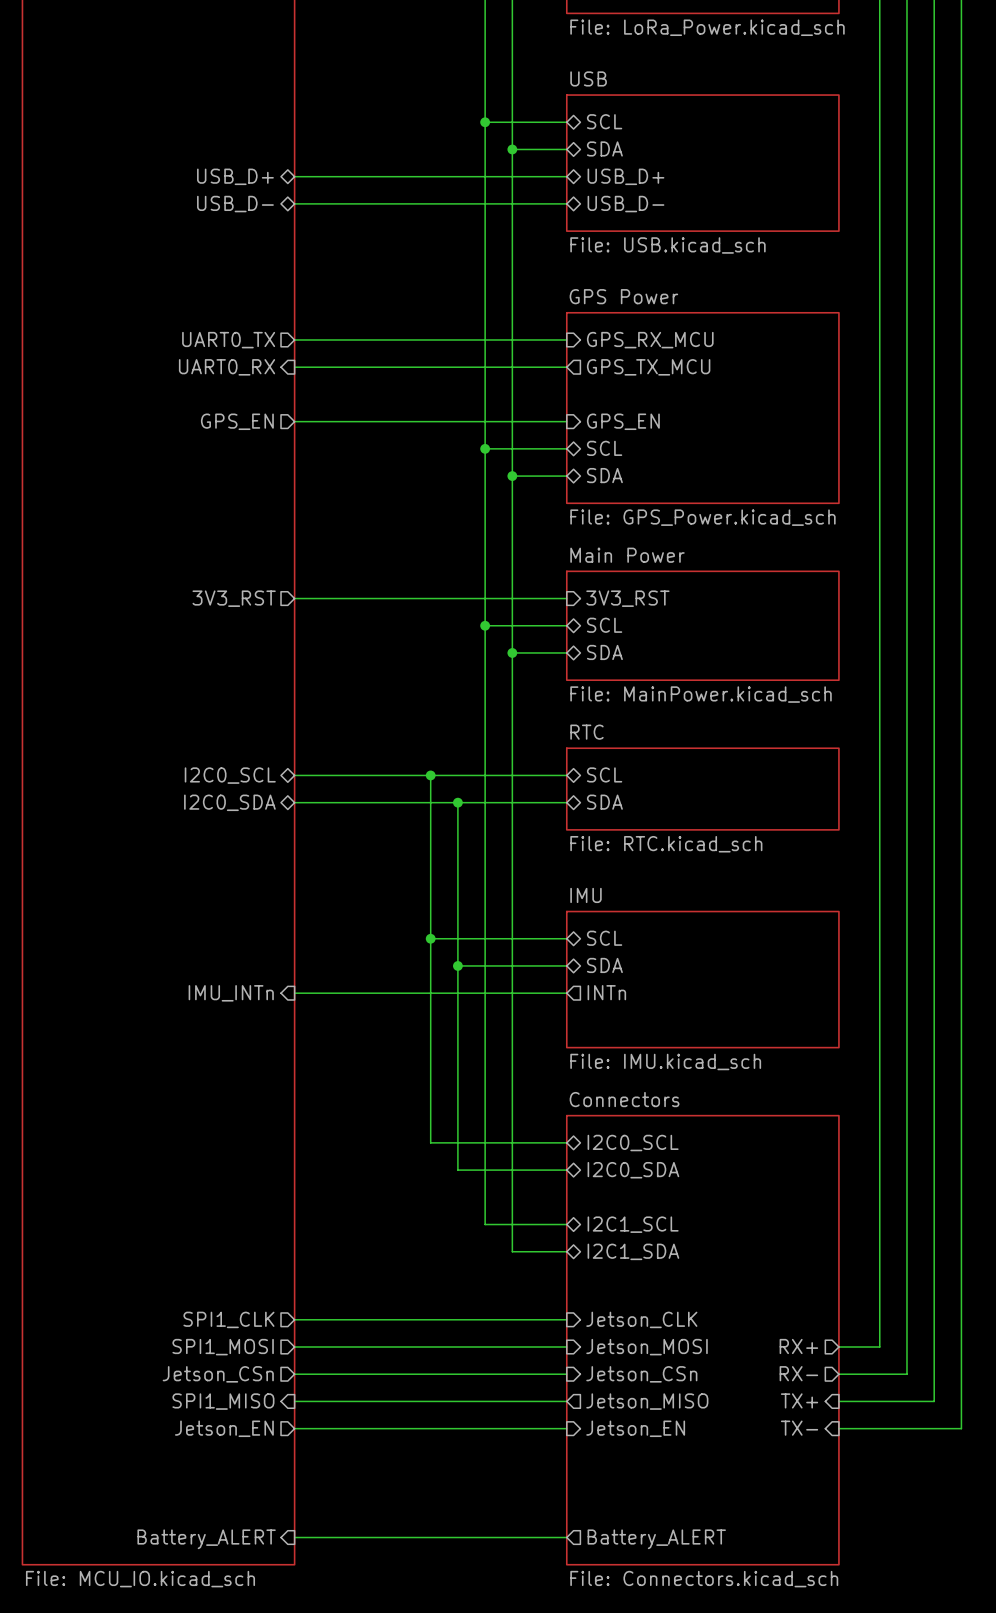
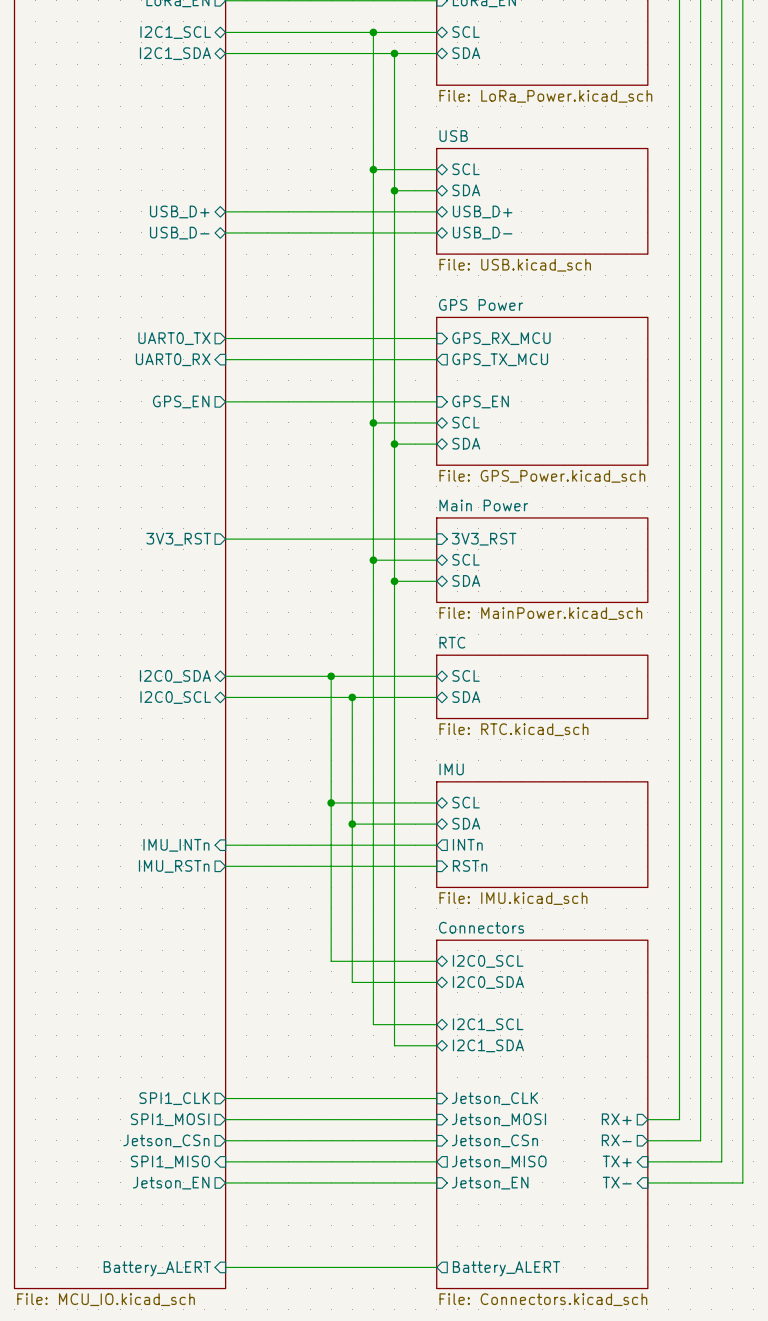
sheet pin: I2C0_SCL (230, 775) -> I2C0_SDA (175, 676)
sheet pin: I2C0_SDA (229, 802) -> I2C0_SCL (175, 697)
sheet pin: none -> RSTn (470, 865)
sheet pin: none -> IMU_RSTn (174, 866)
wire: none -> (225, 866) (436, 866)

